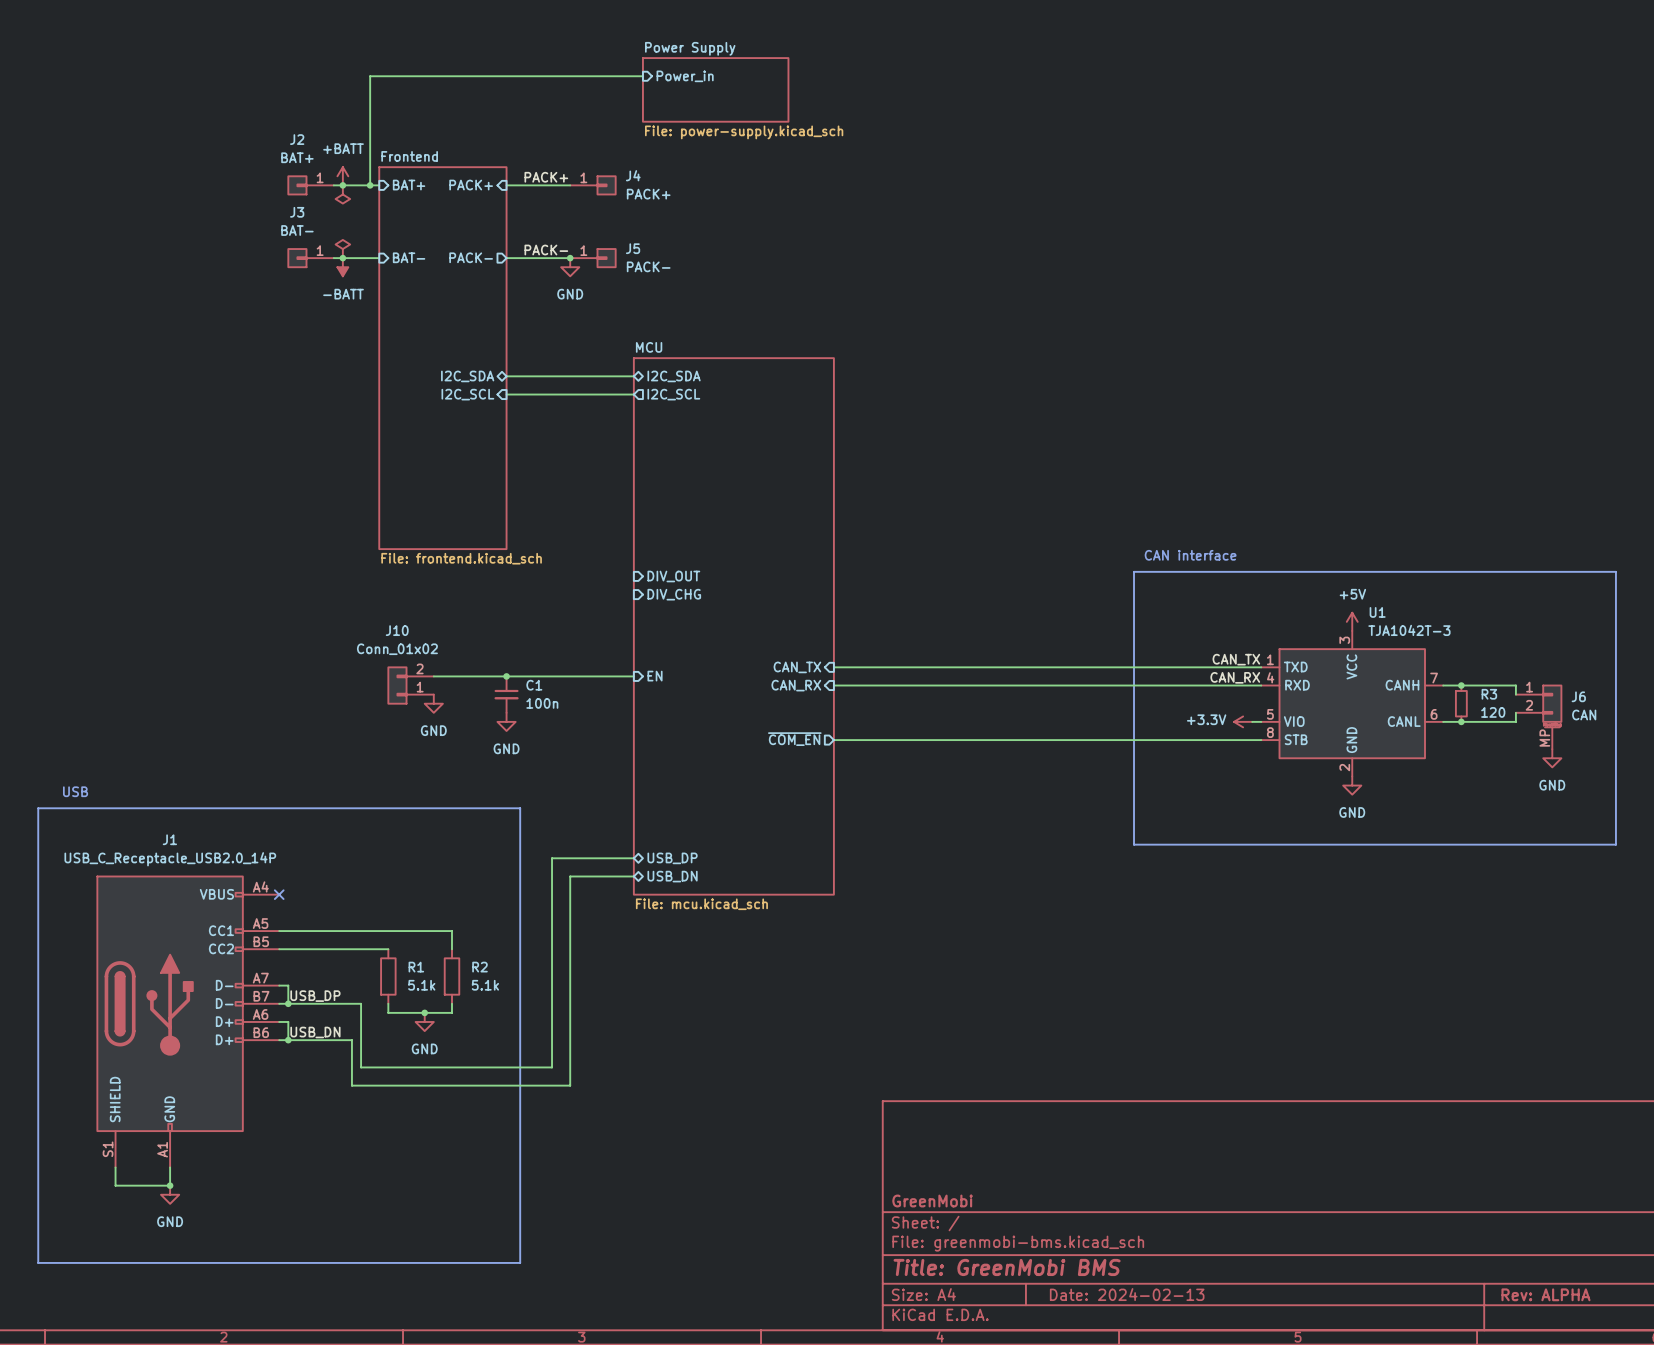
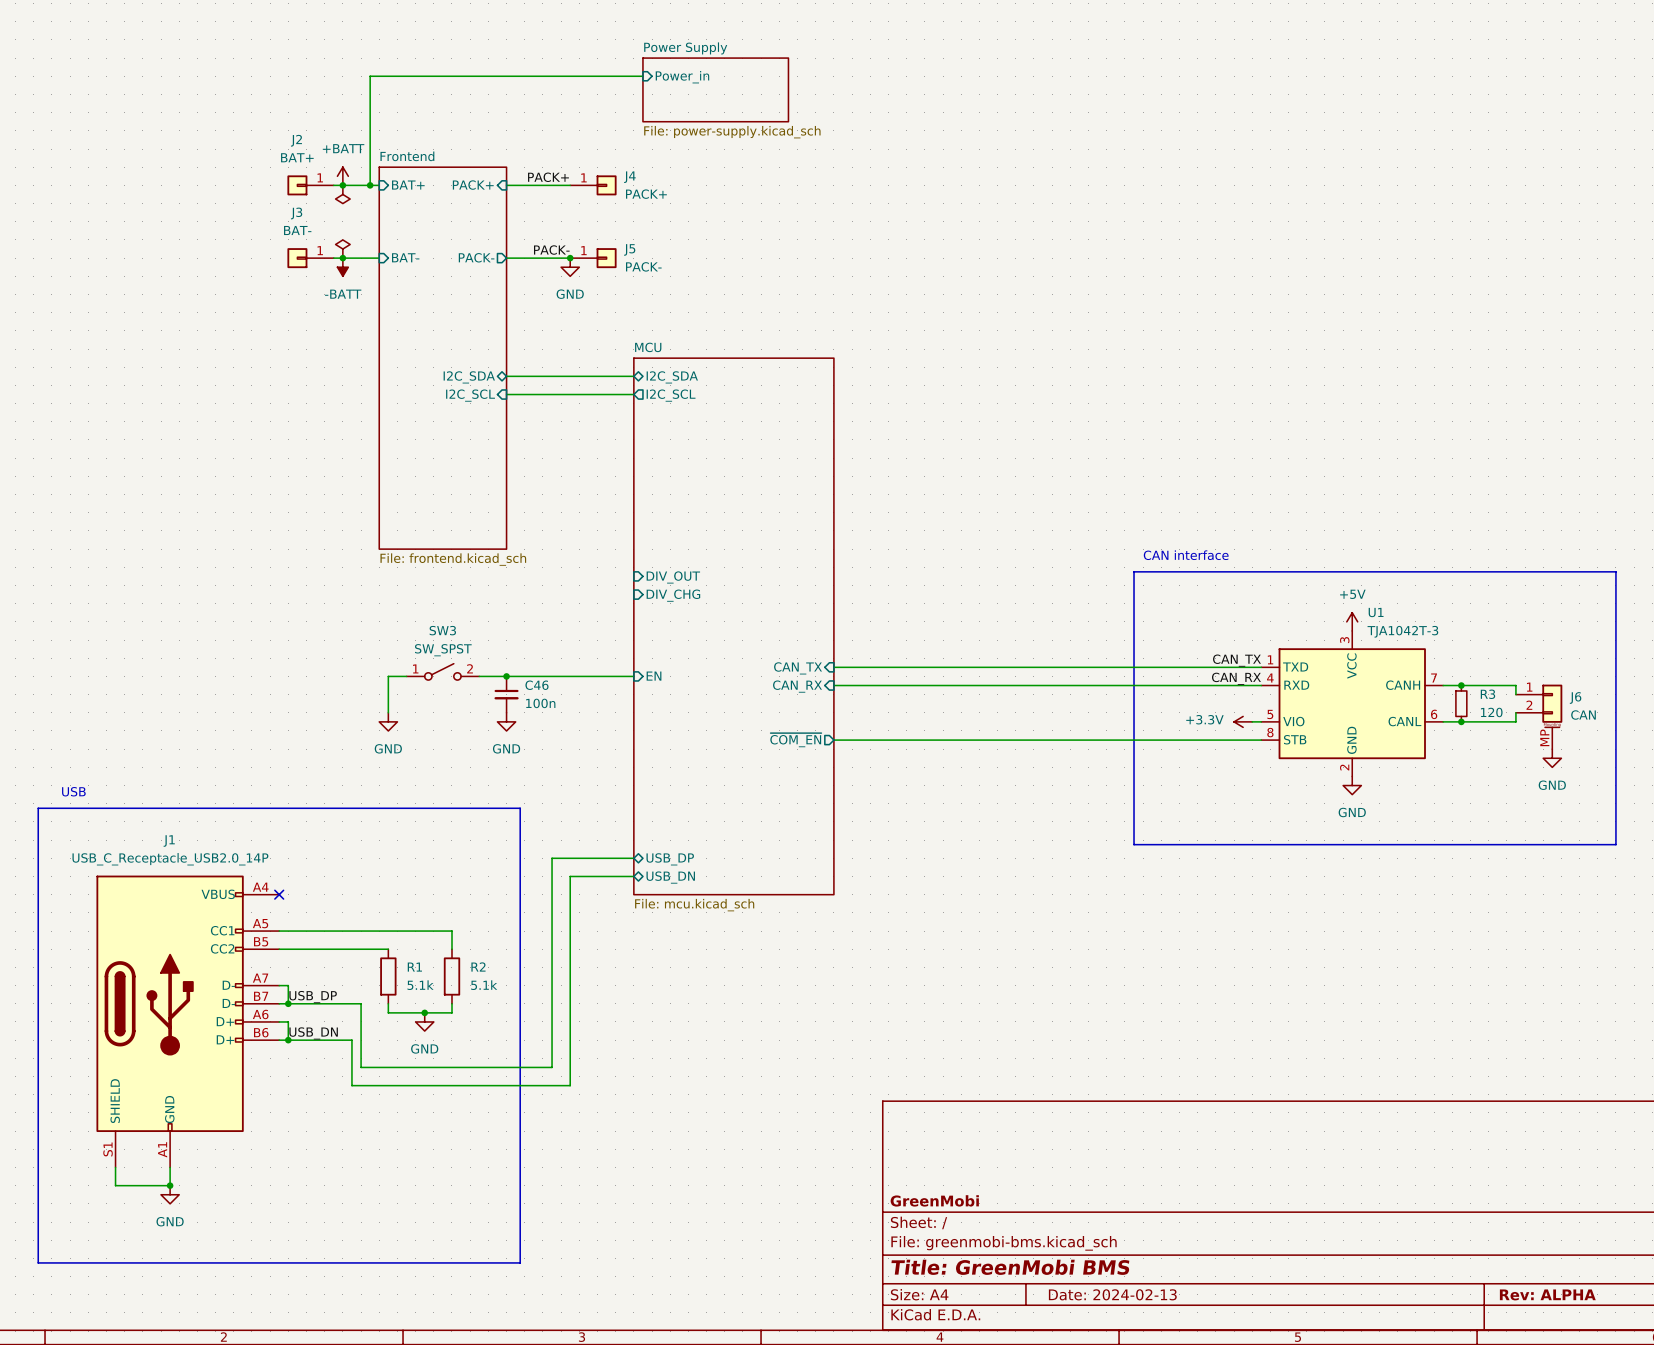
SW3: none -> SW_SPST (442, 671)
wire: (433, 676) (479, 676) -> none
J10: Conn_01x02 (410, 685) -> none
C1 name: C1 (534, 685) -> C46 (536, 685)
power symbol position: GND (433, 703) -> GND (388, 721)

